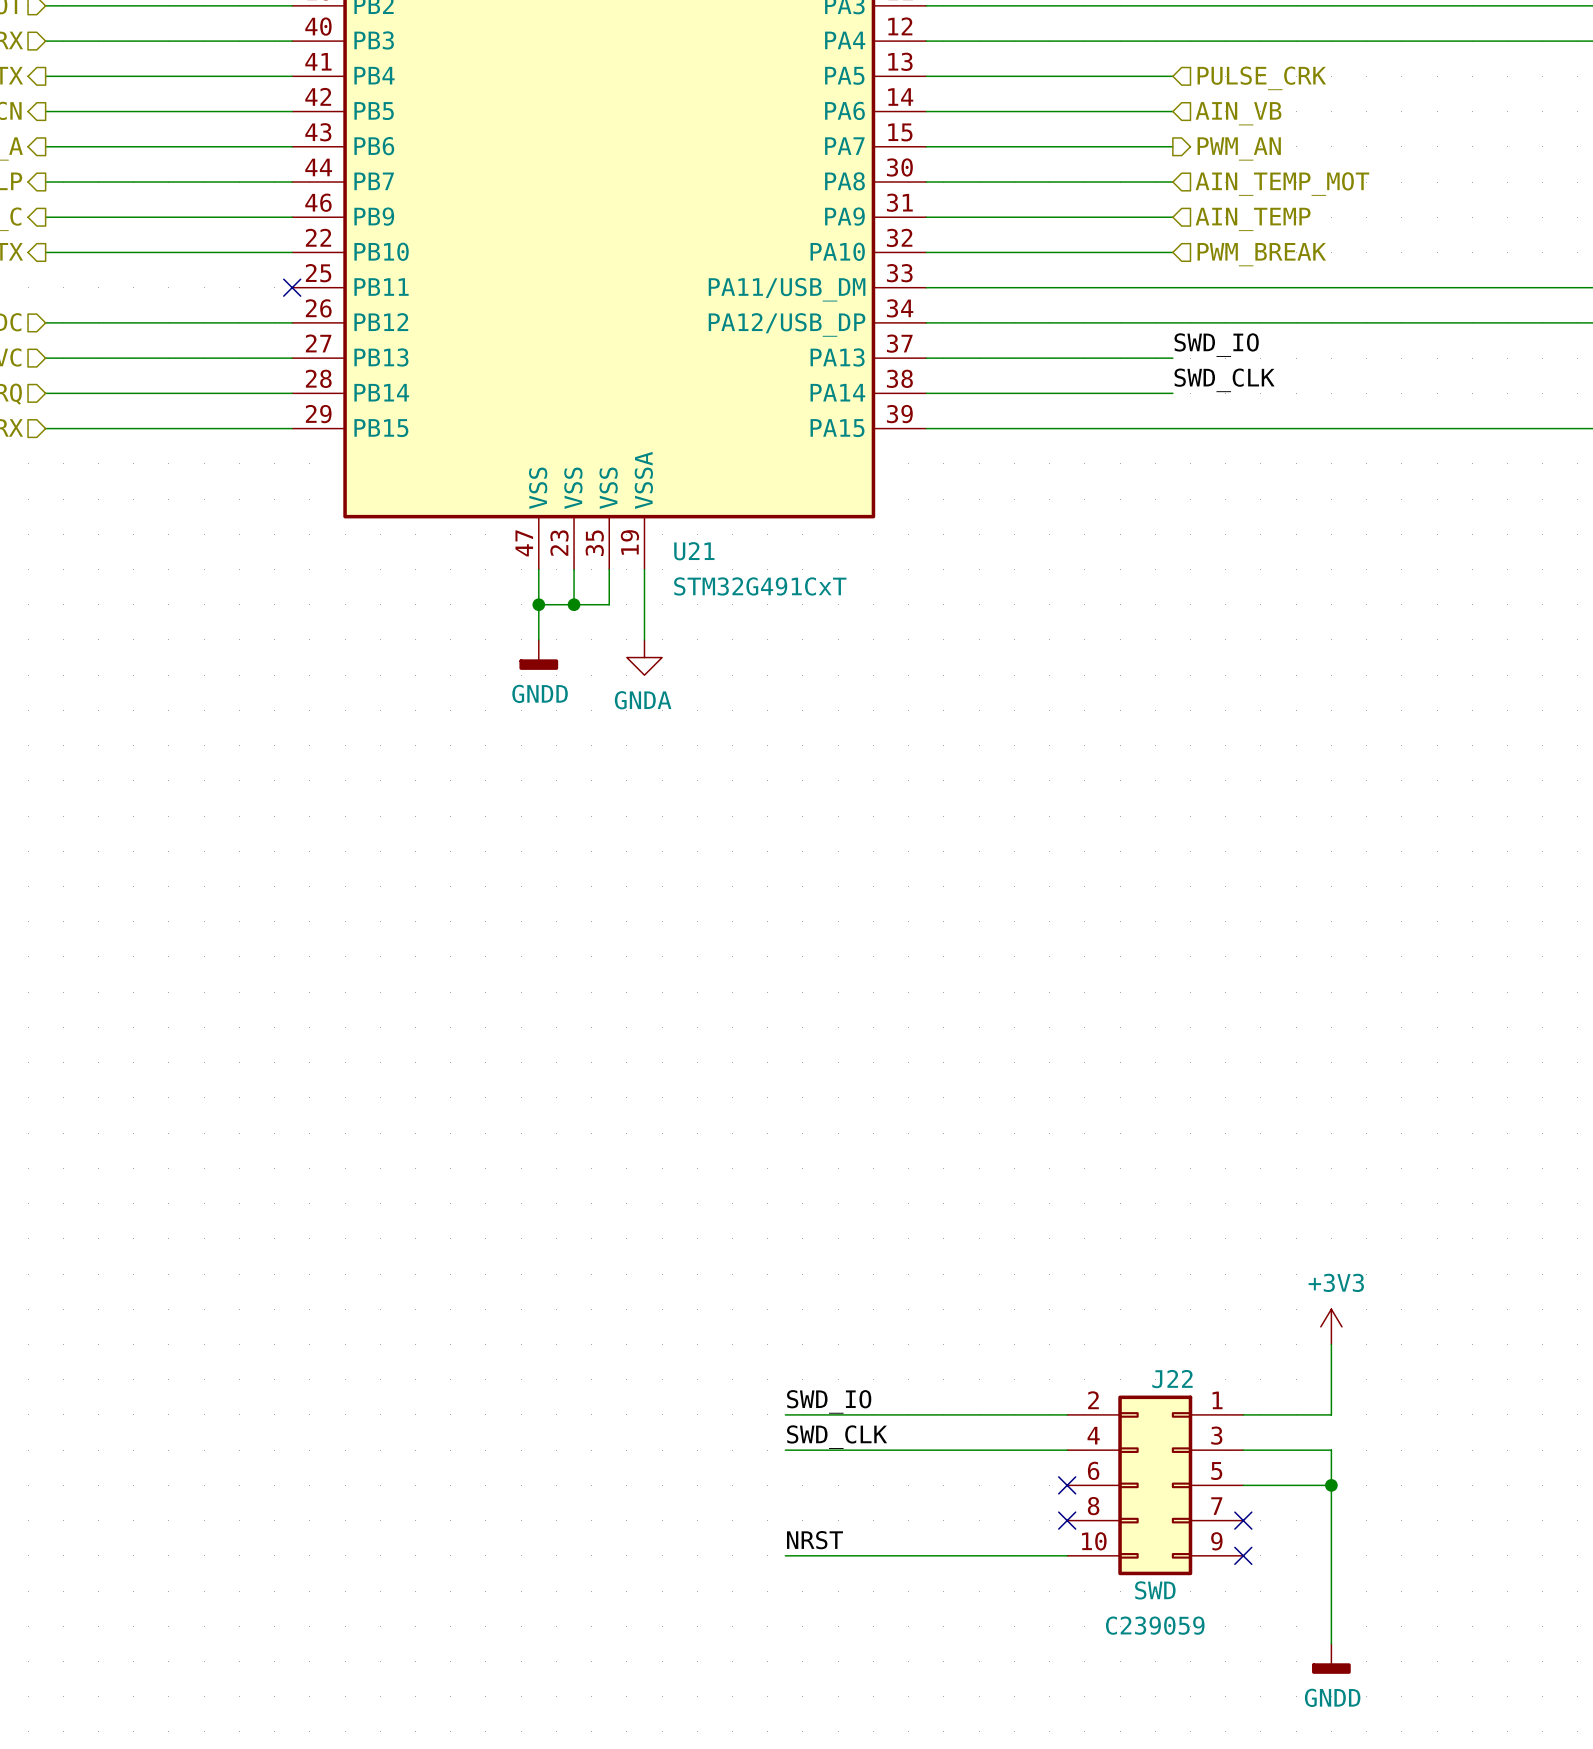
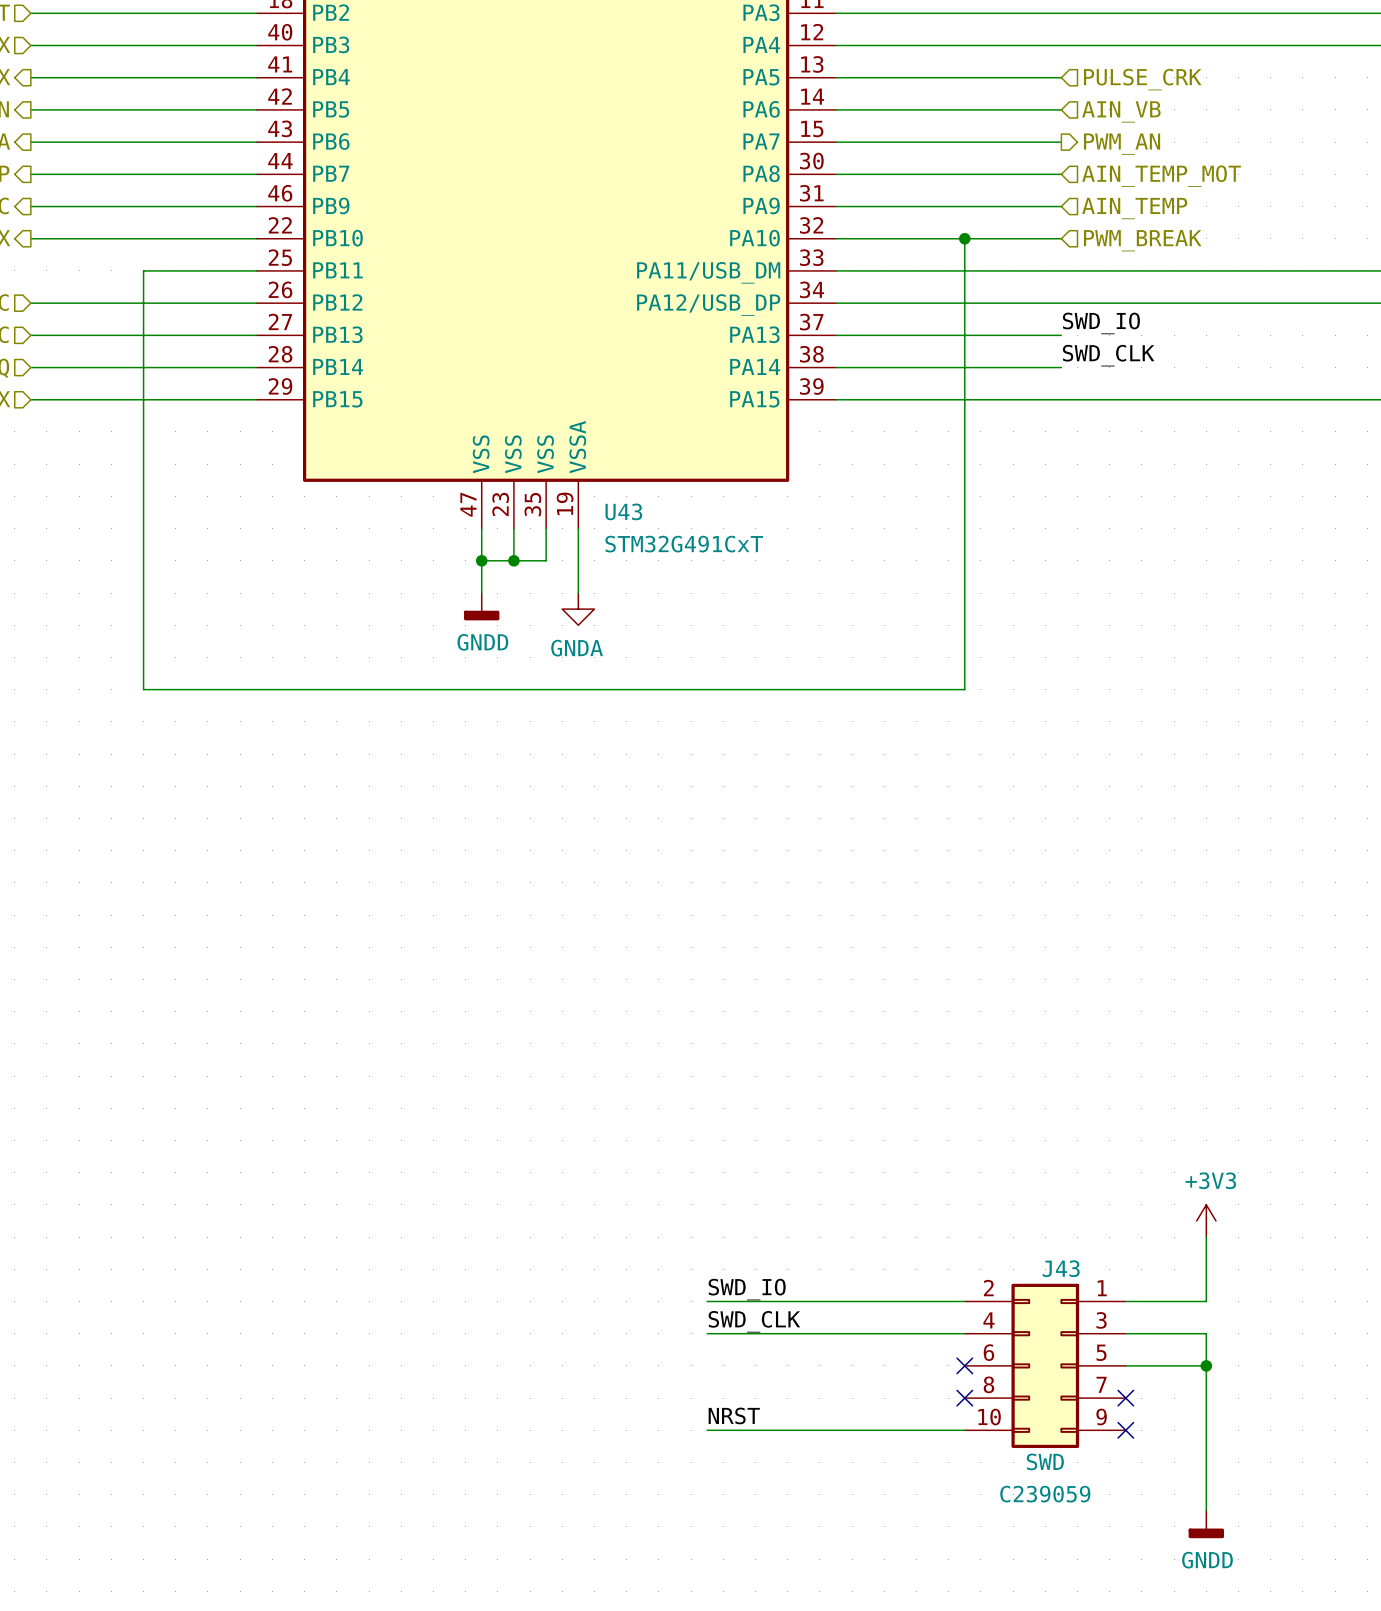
wire: none -> (964, 238) (964, 689) (143, 689) (143, 270) (256, 270)
junction: none -> (964, 238)
no-connect mark: (292, 287) -> none
U21 name: U21 (694, 551) -> U43 (623, 511)
J22 name: J22 (1172, 1379) -> J43 (1061, 1268)

